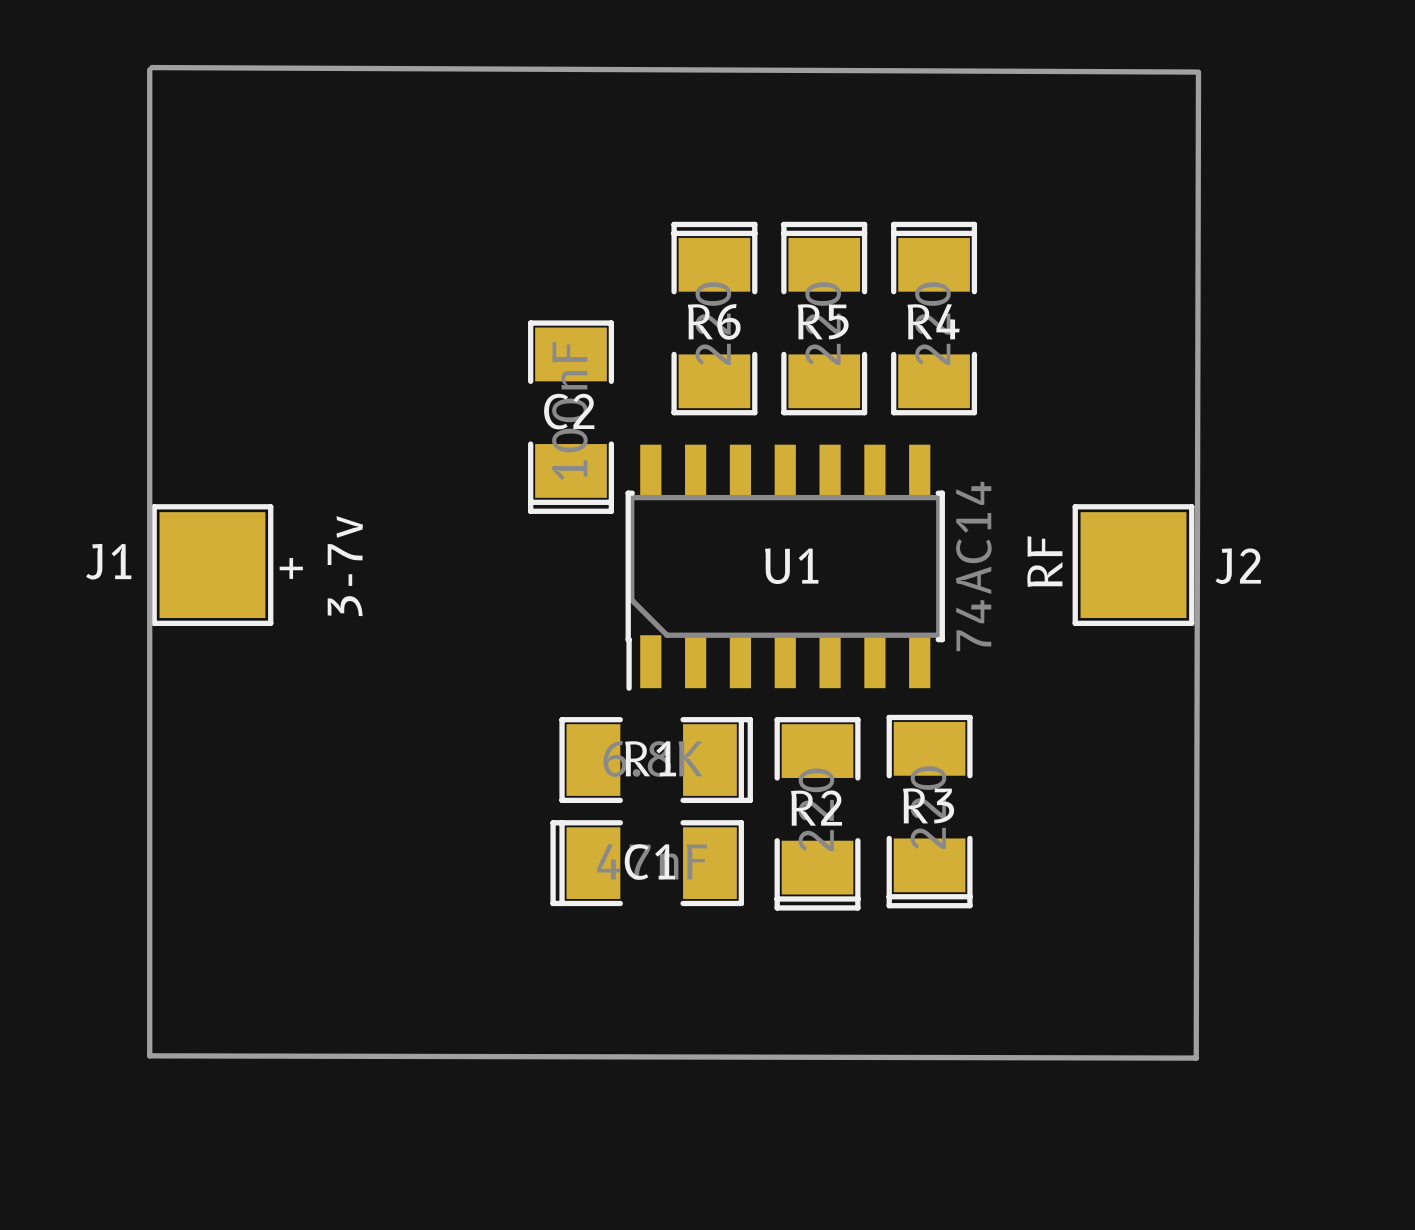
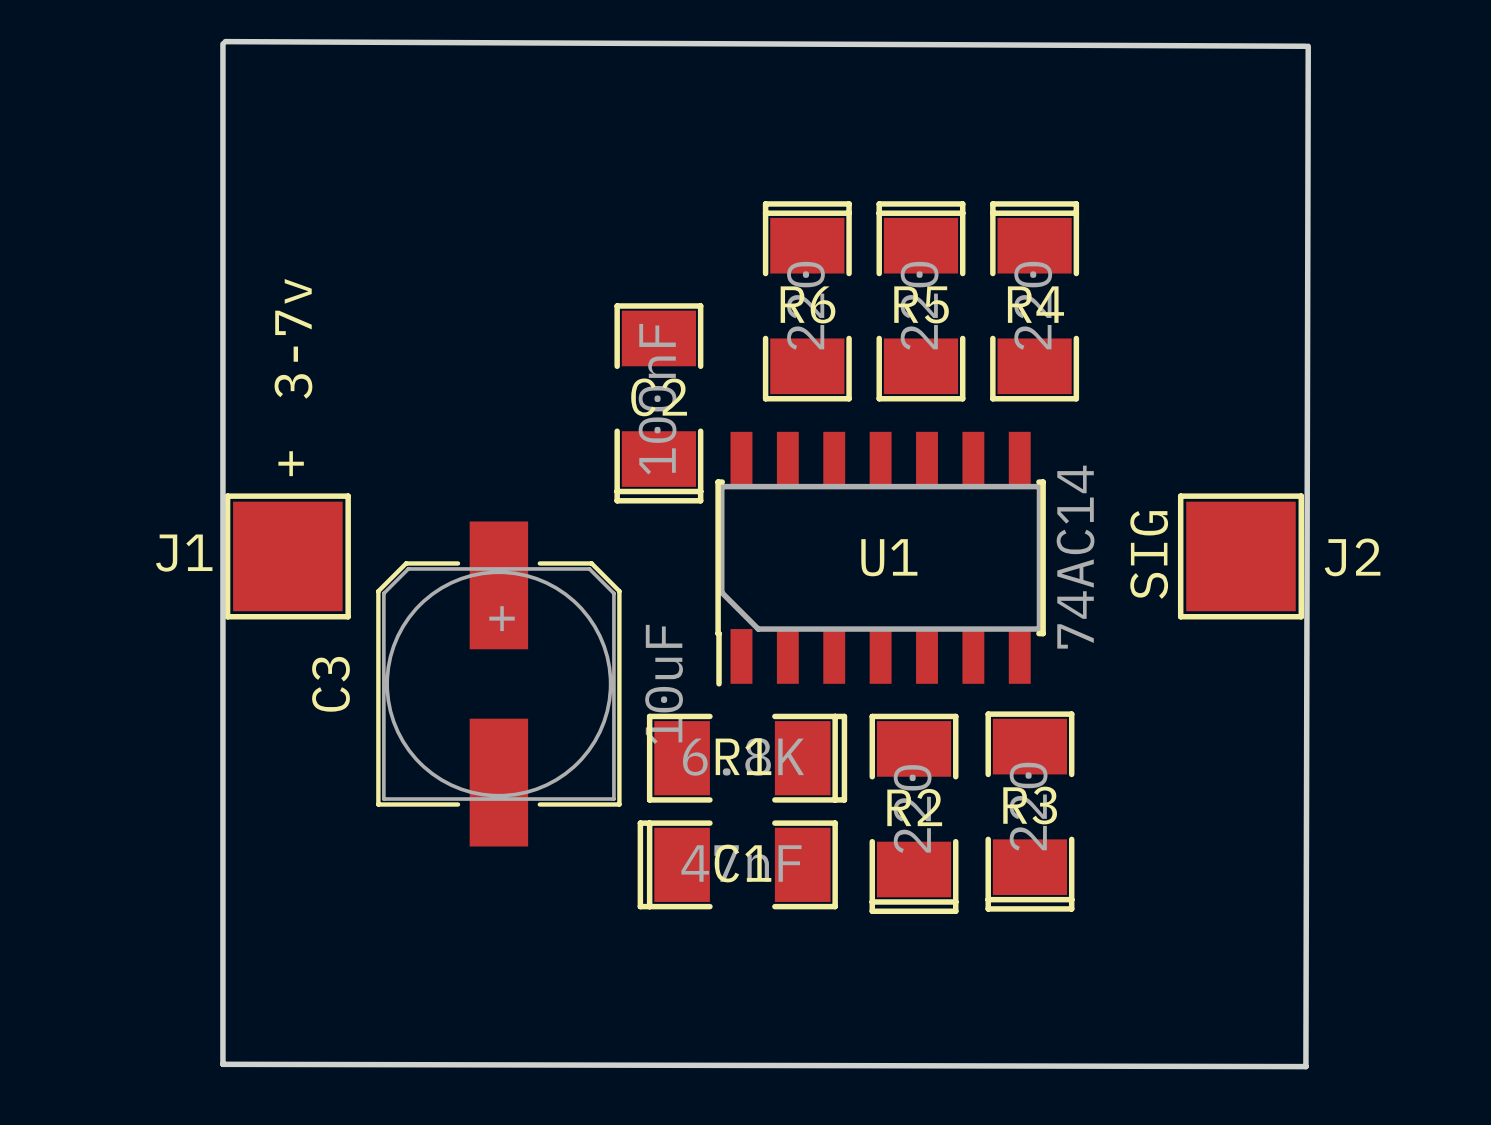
text: RF (1044, 561) -> SIG (1149, 554)
text position: 3-7v (345, 566) -> 3-7v (293, 338)
text: + (291, 568) -> none
C3: none -> 10uF (498, 683)

